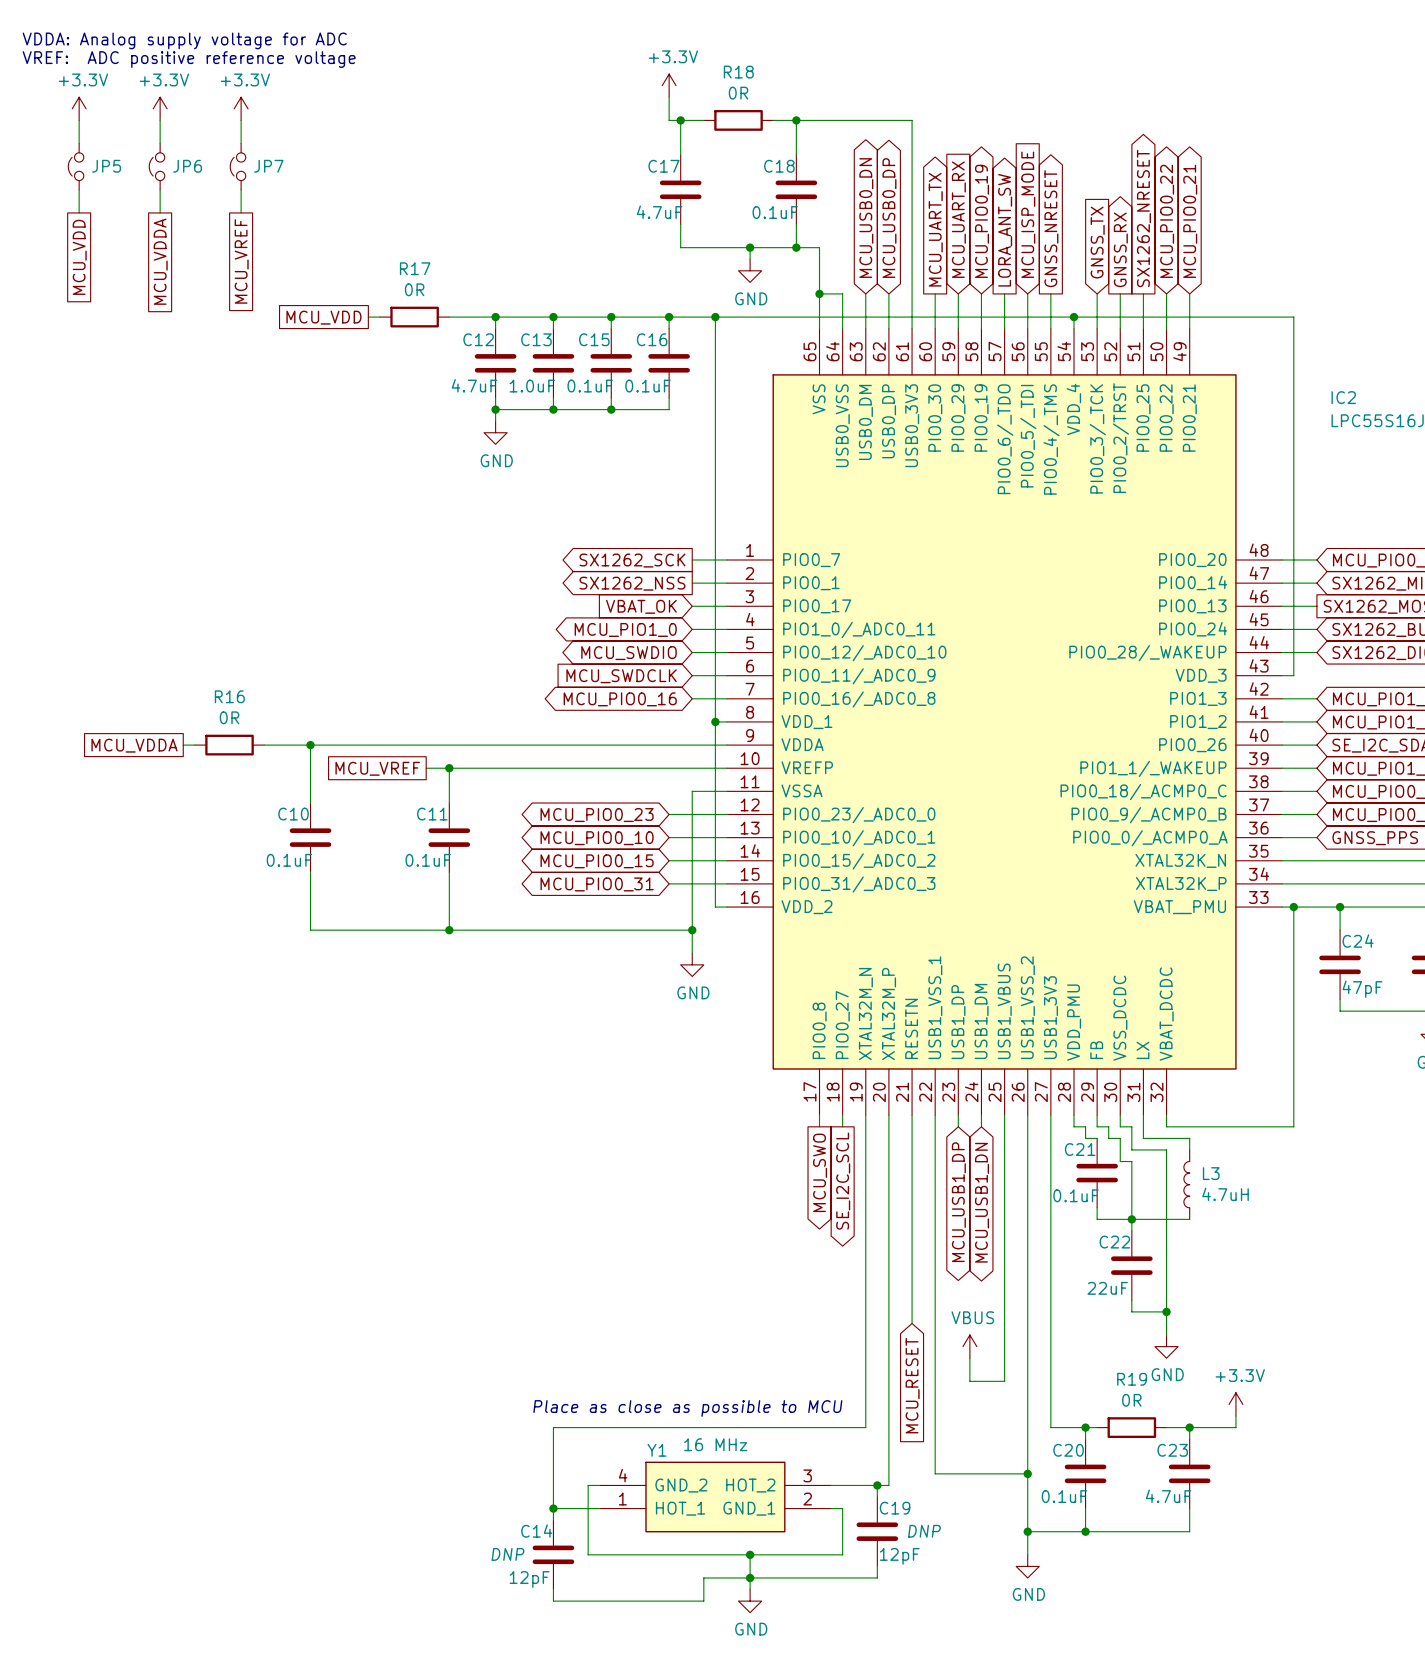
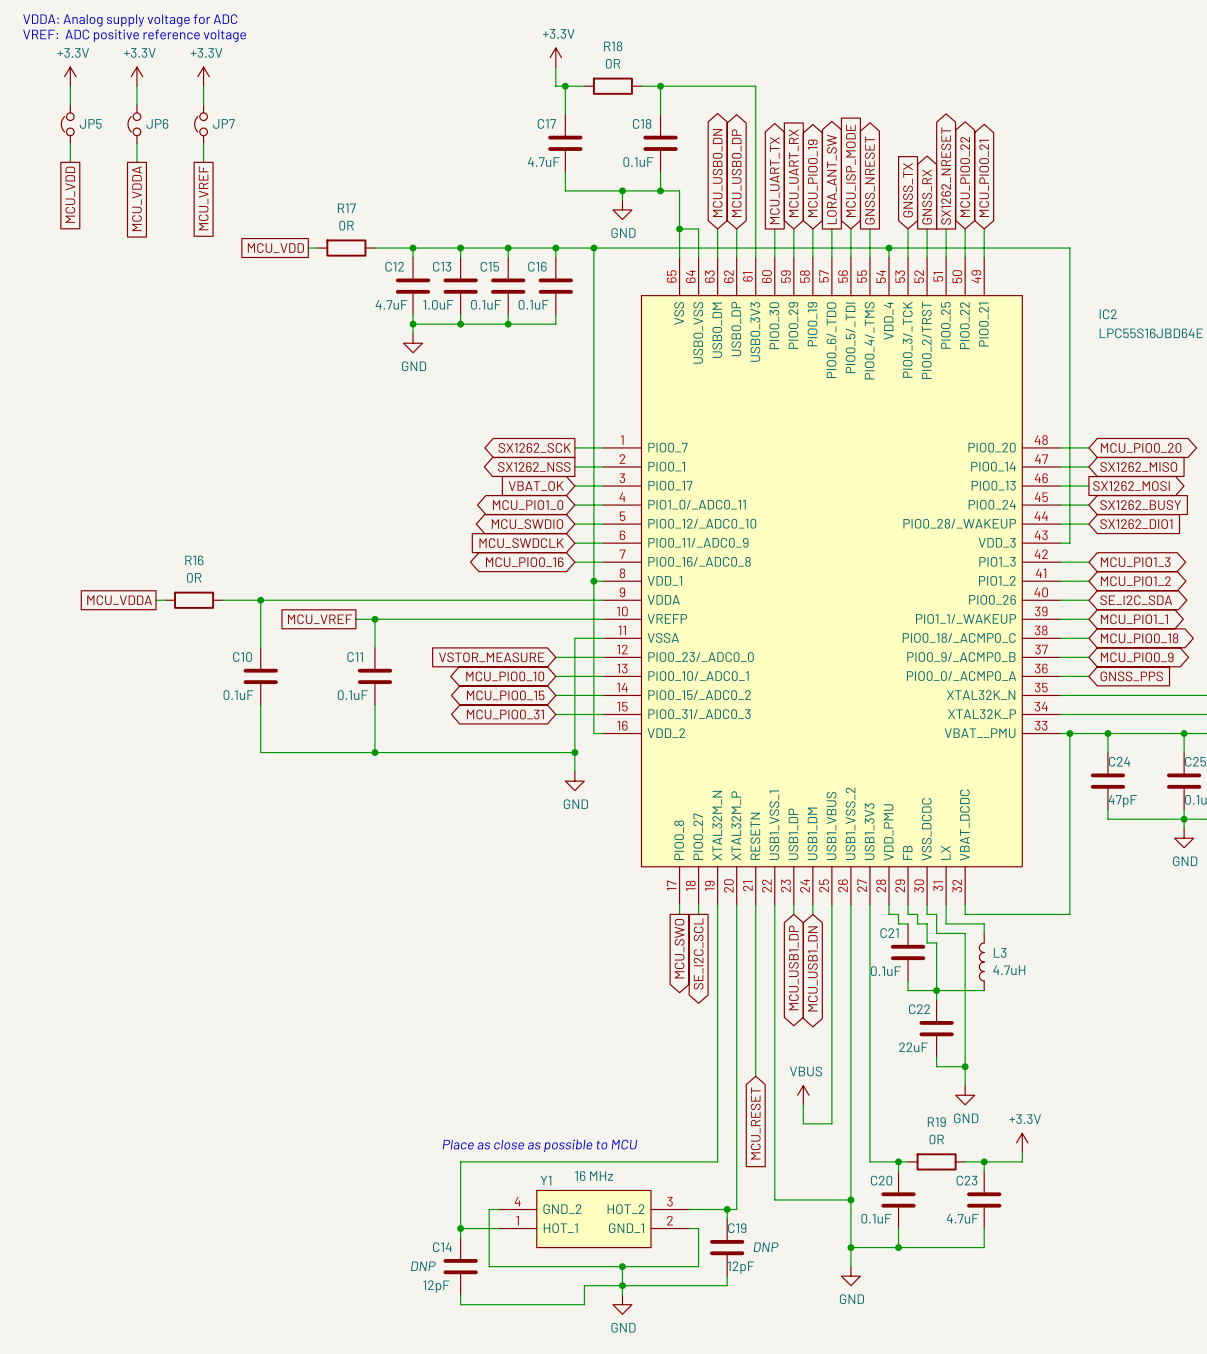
global label shape: bidirectional (597, 815) -> input (491, 657)
global label: MCU_PIO0_23 (597, 815) -> VSTOR_MEASURE (491, 657)

